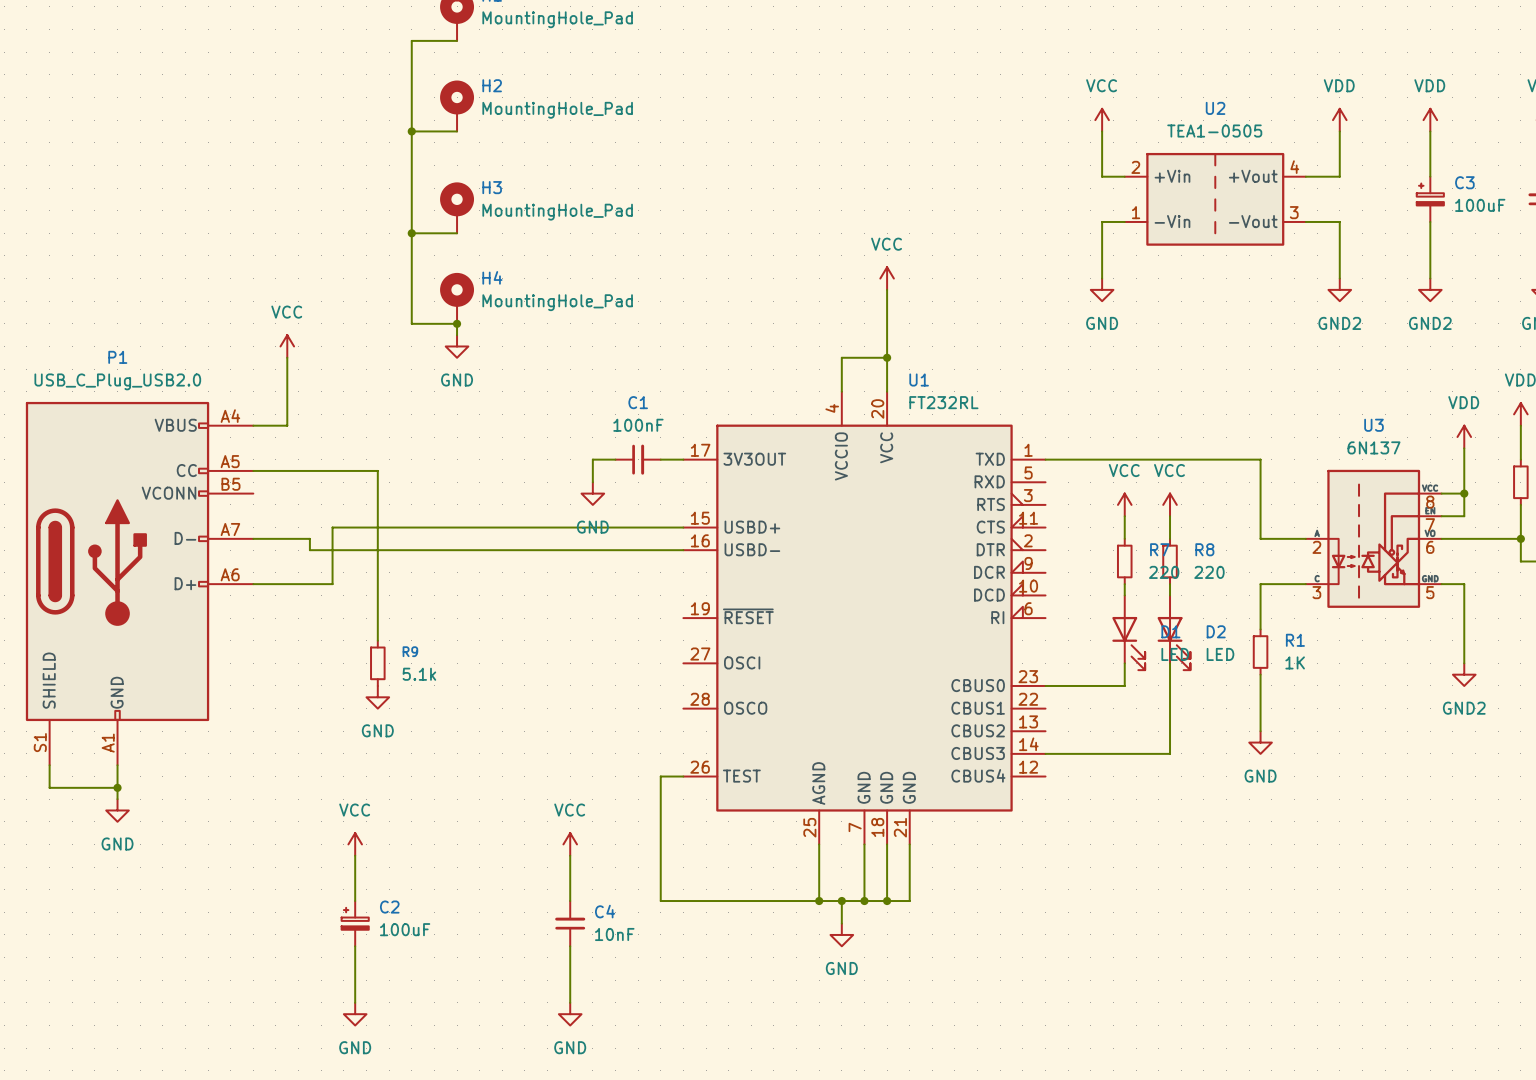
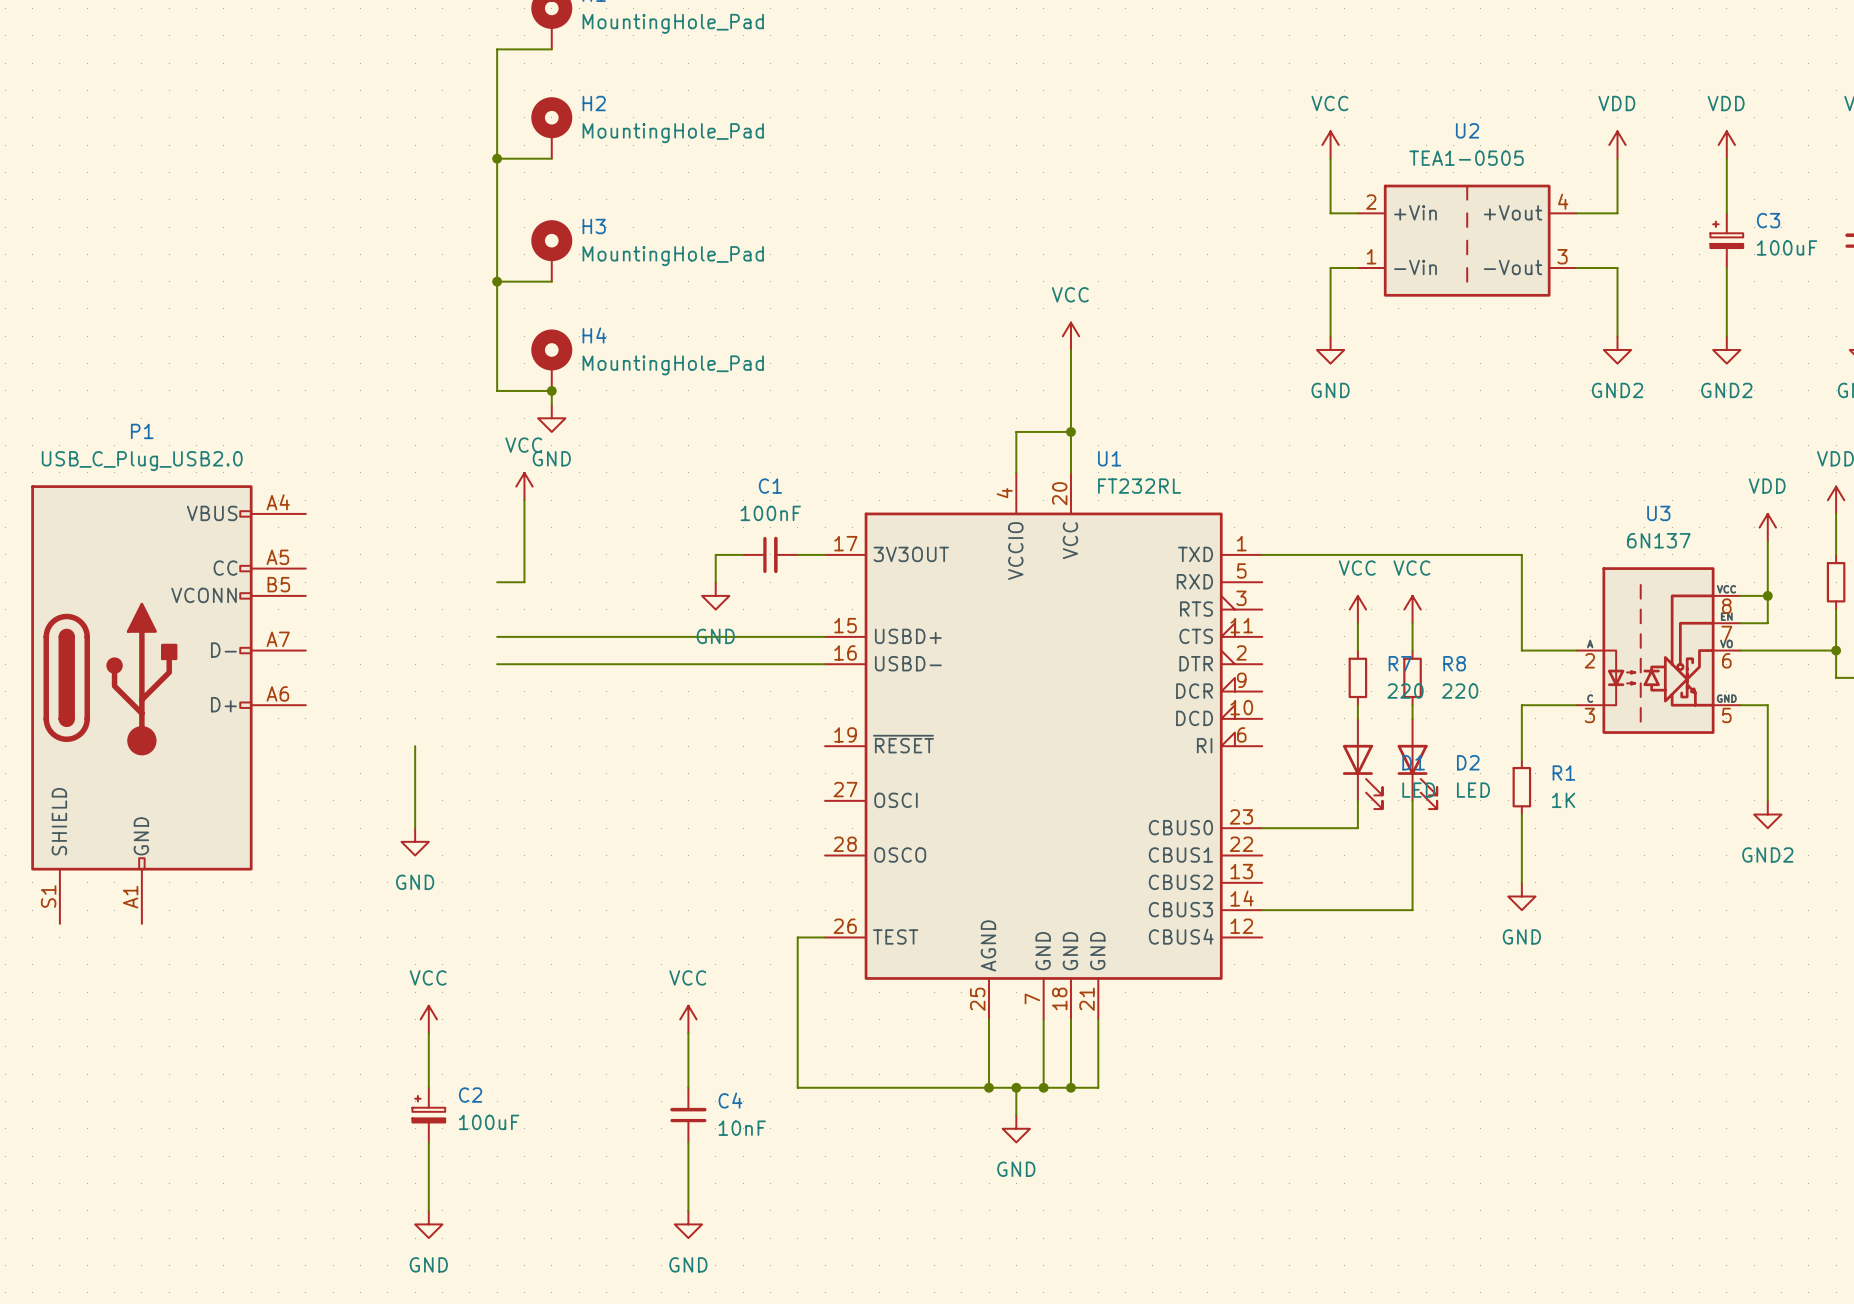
power symbol position: VCC (287, 346) -> VCC (524, 486)
wire: (287, 357) (287, 425) (253, 425) -> none
wire: none -> (524, 500) (524, 582) (497, 582)
wire: (253, 470) (377, 470) (377, 640) -> none
wire: (411, 527) (332, 527) (332, 584) (253, 584) -> none
wire: (253, 538) (309, 538) (309, 550) (411, 550) -> none
wire: none -> (415, 746) (415, 828)
R9: 5.1k (377, 663) -> none
power symbol position: GND (377, 697) -> GND (415, 841)
wire: (49, 765) (49, 787) (117, 787) -> none
wire: (117, 765) (117, 799) -> none
junction: (117, 787) -> none
power symbol: GND (117, 810) -> none

